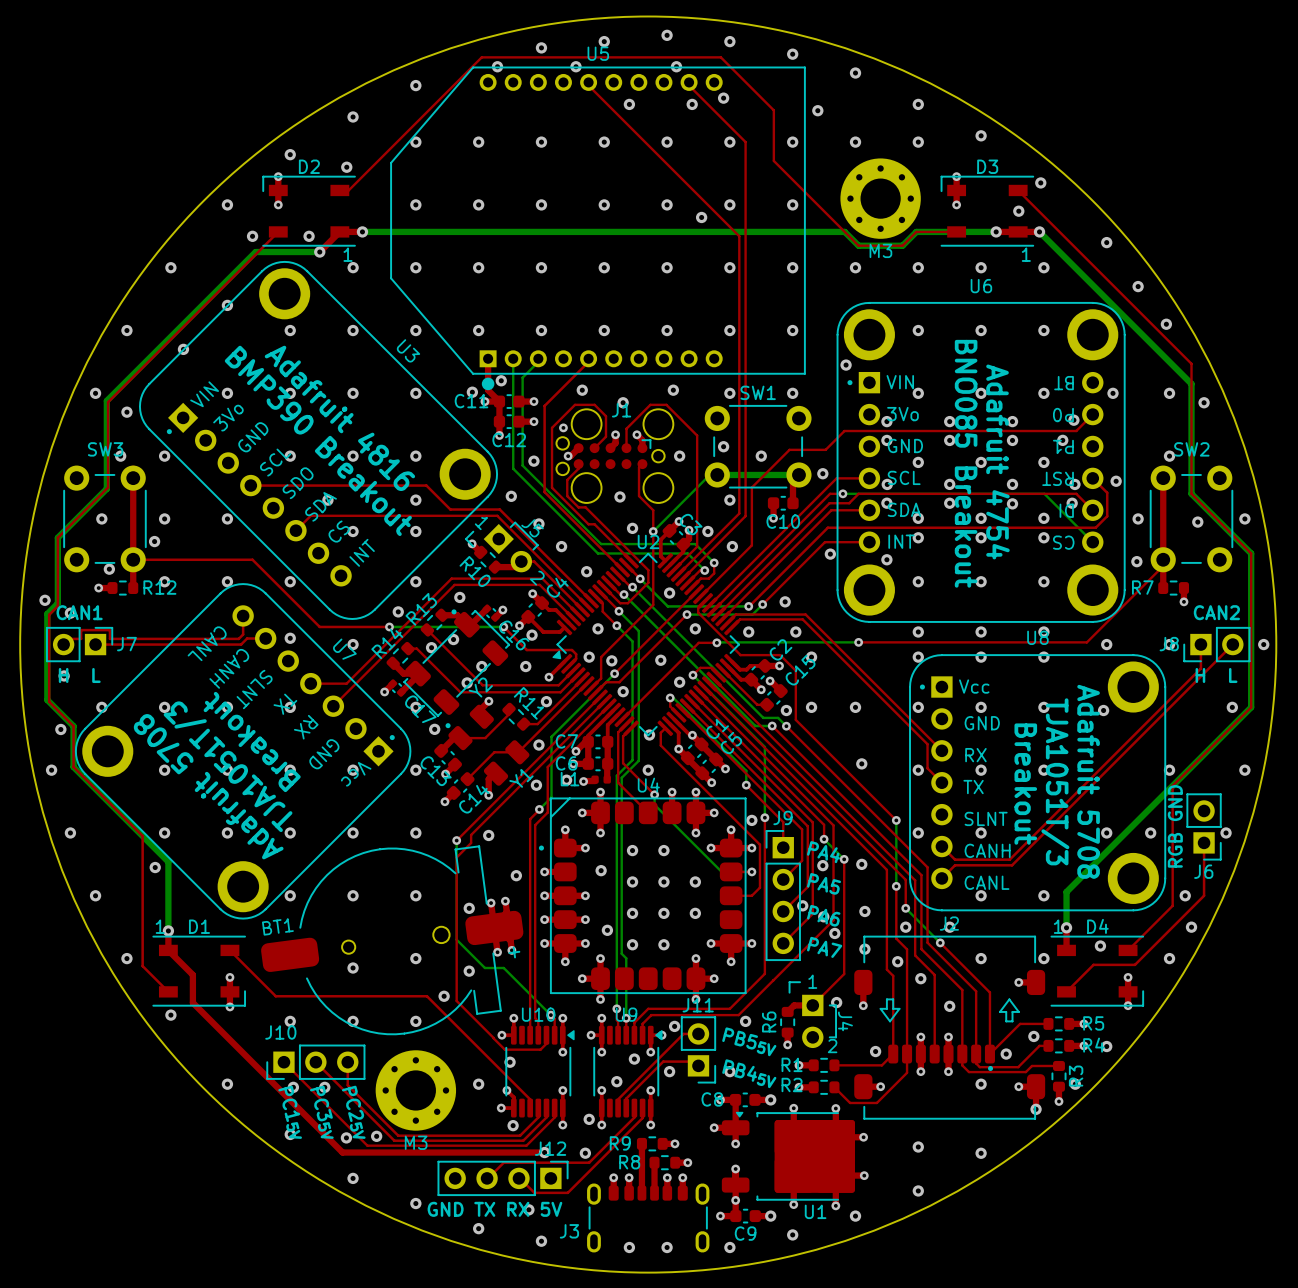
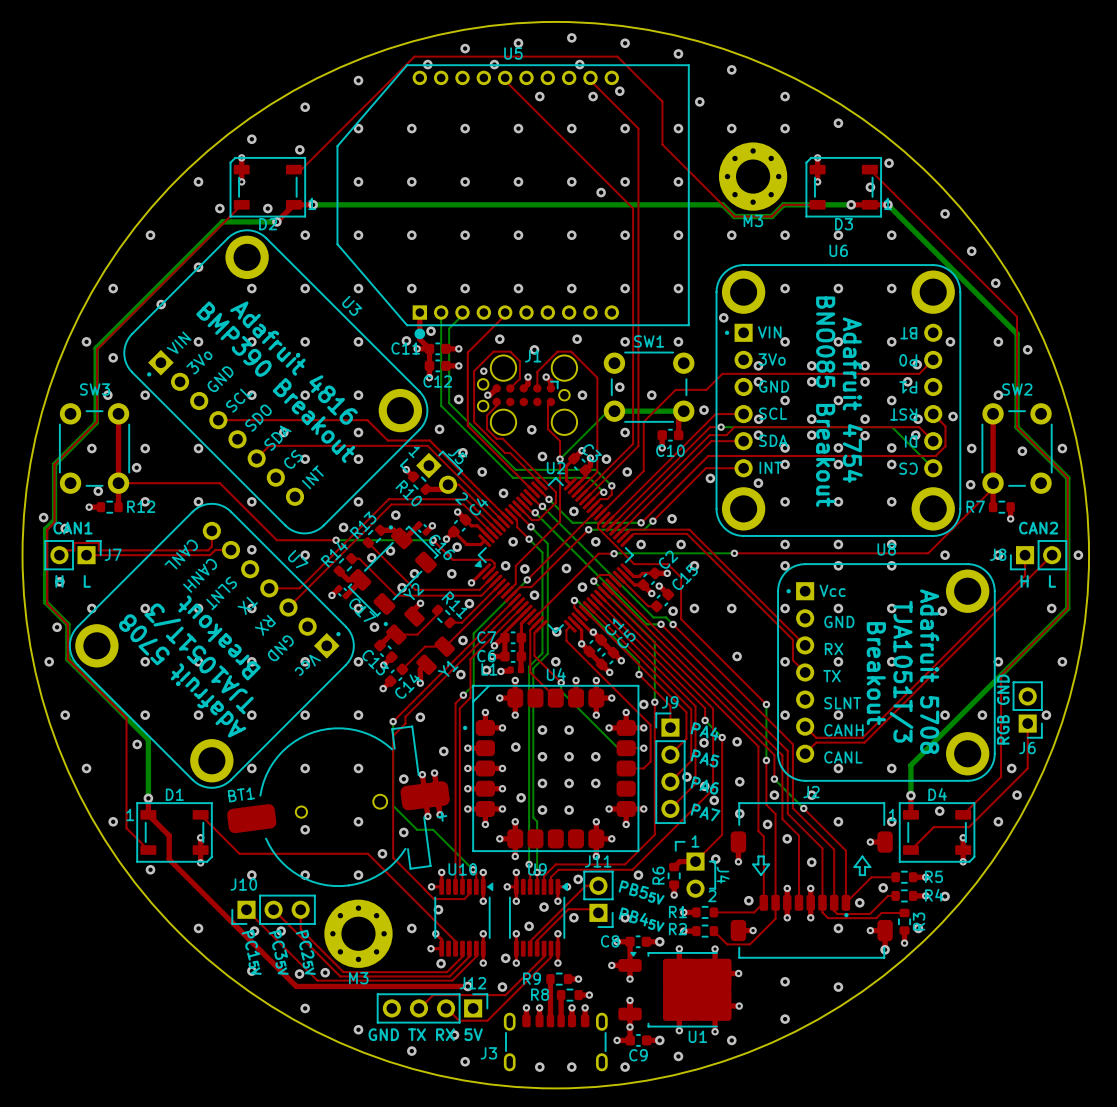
D2 name position: D2 (309, 166) -> D2 (268, 224)
D3 name position: D3 (987, 166) -> D3 (844, 224)
D2 footprint: [262, 175, 356, 247] -> [229, 157, 306, 218]
D3 footprint: [940, 175, 1034, 247] -> [805, 157, 882, 218]
D1 footprint: [152, 935, 246, 1007] -> [136, 802, 213, 863]
D4 footprint: [1050, 935, 1144, 1007] -> [899, 802, 976, 863]

